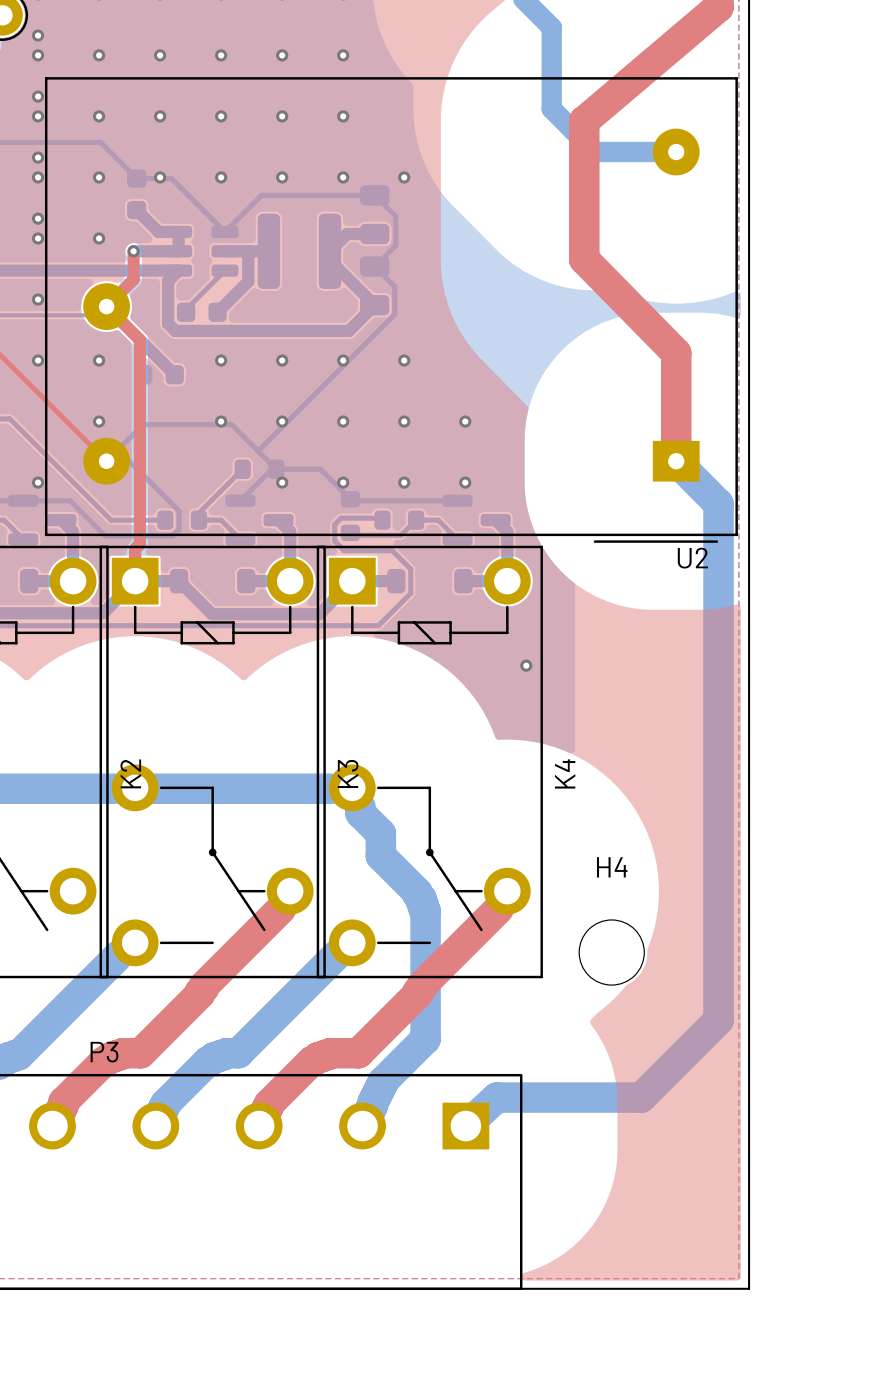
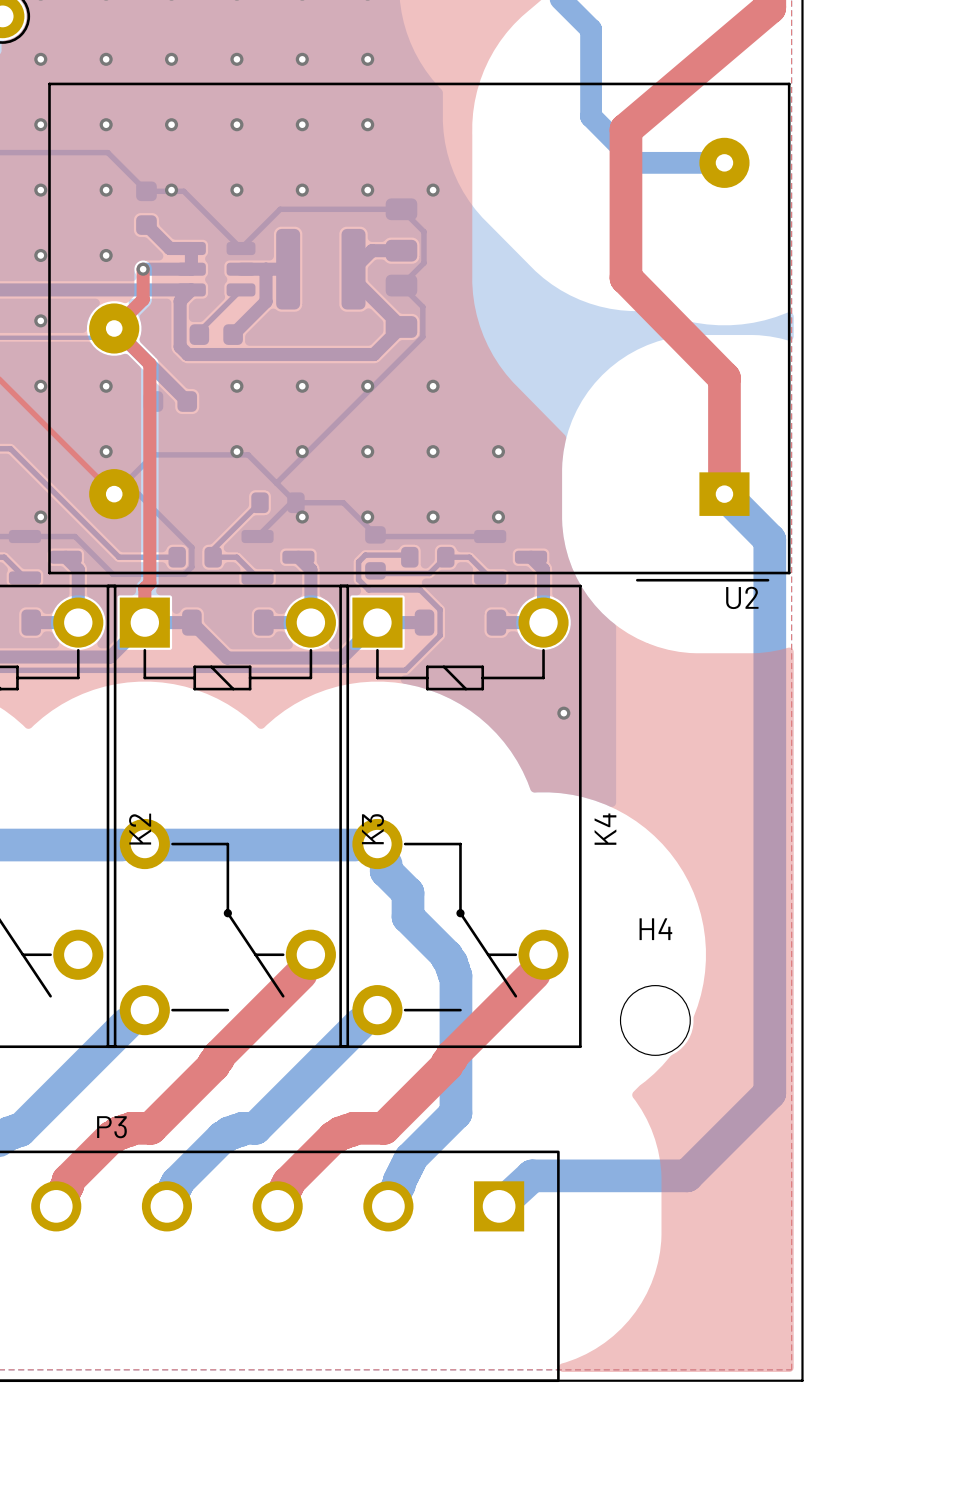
via: (38, 35) -> none
via: (38, 96) -> none
via: (38, 157) -> none
via: (38, 218) -> none

